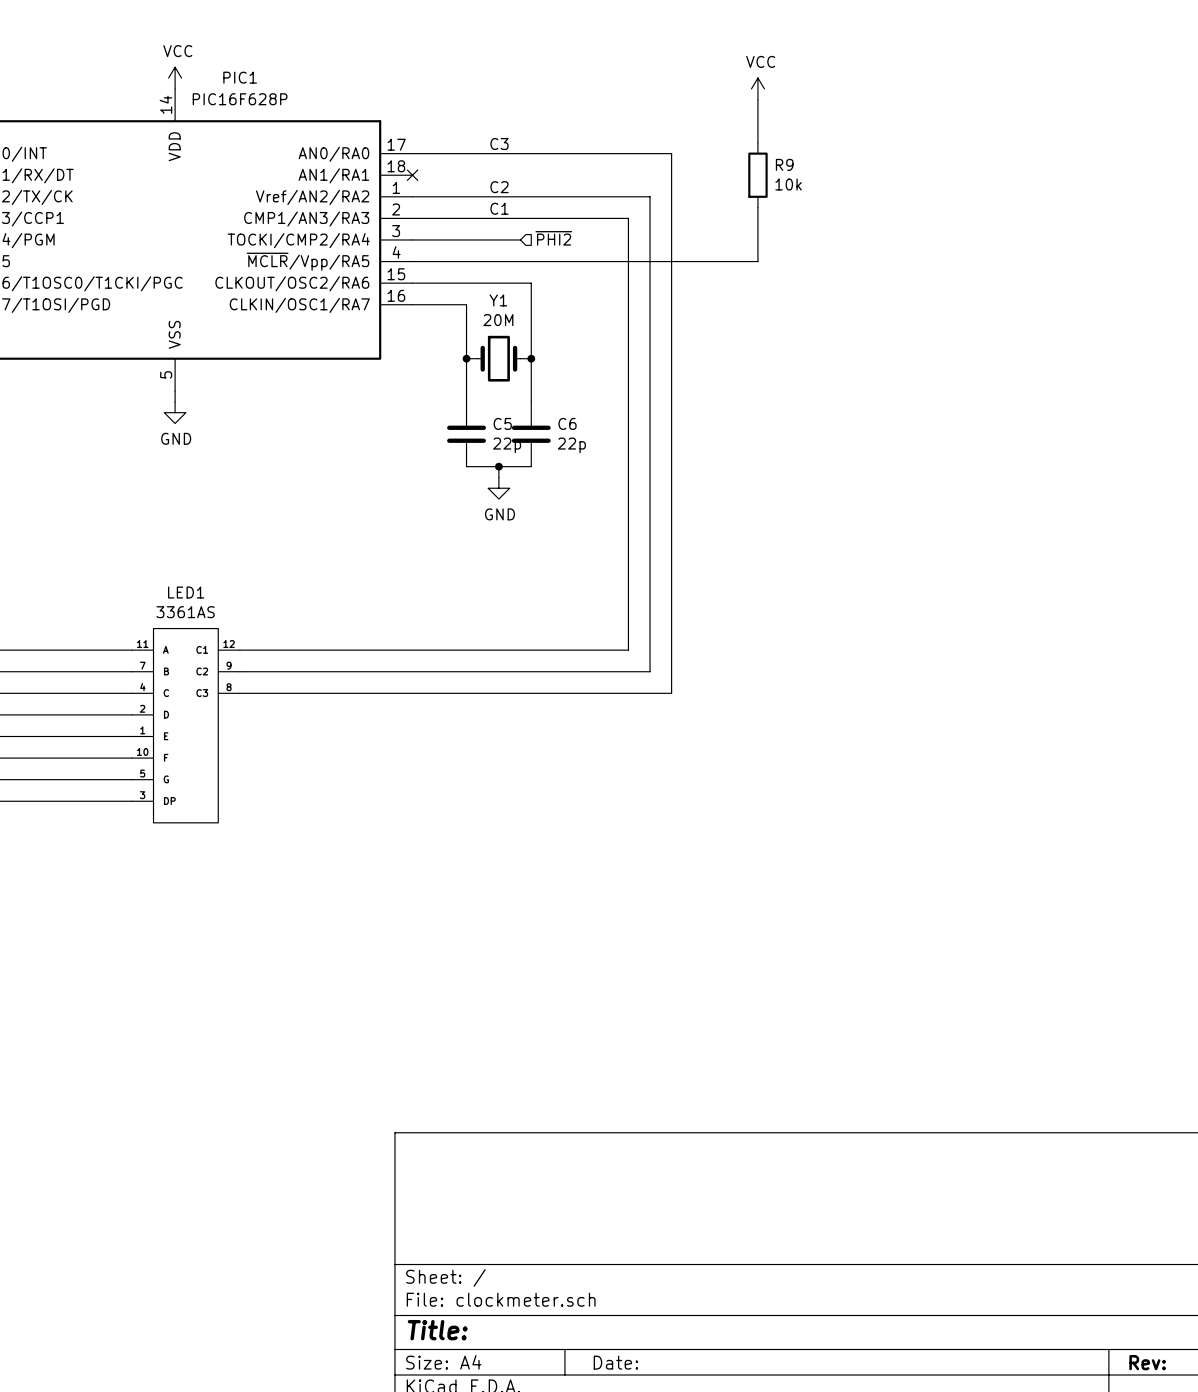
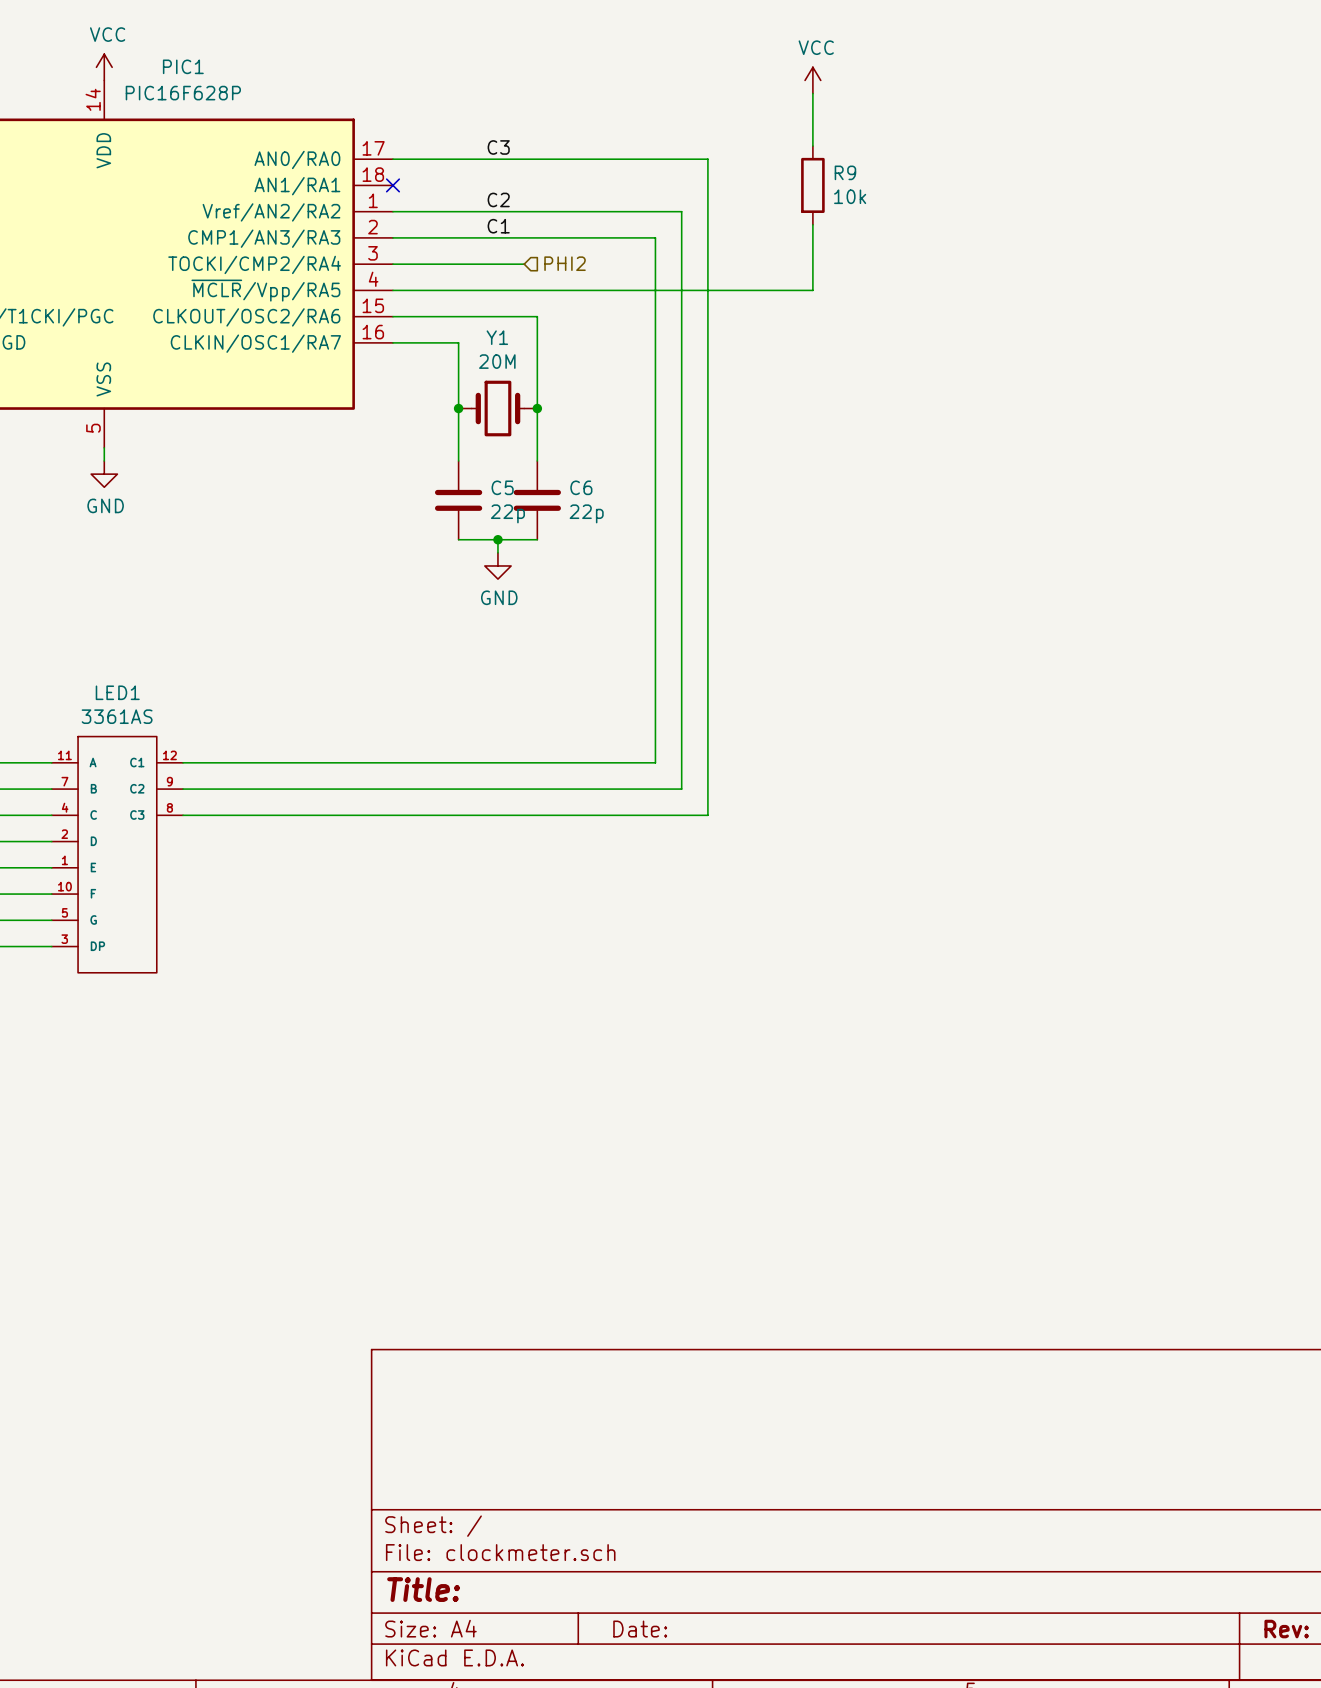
hierarchical label: ~{PHI2} (553, 238) -> PHI2 (565, 263)

